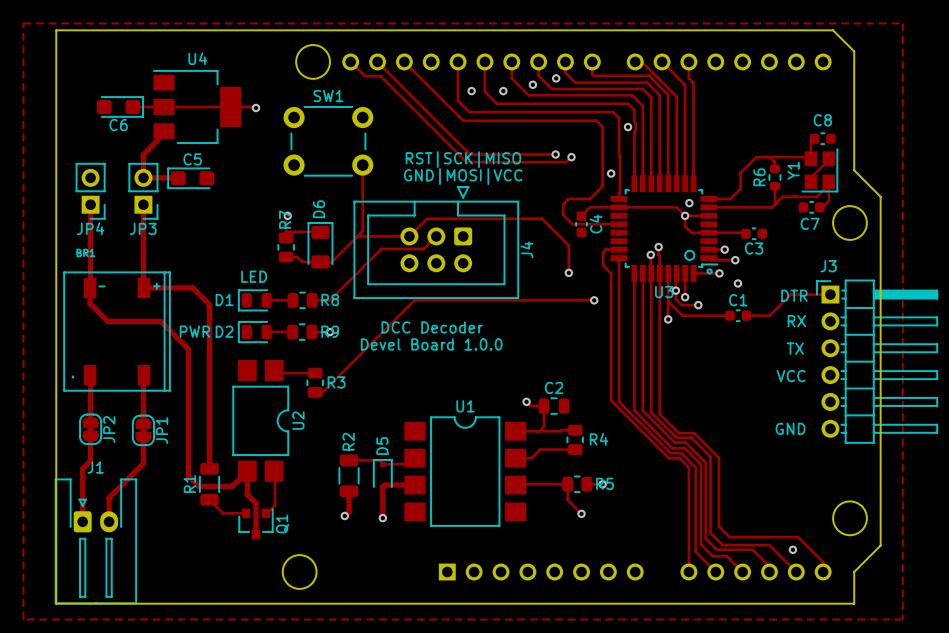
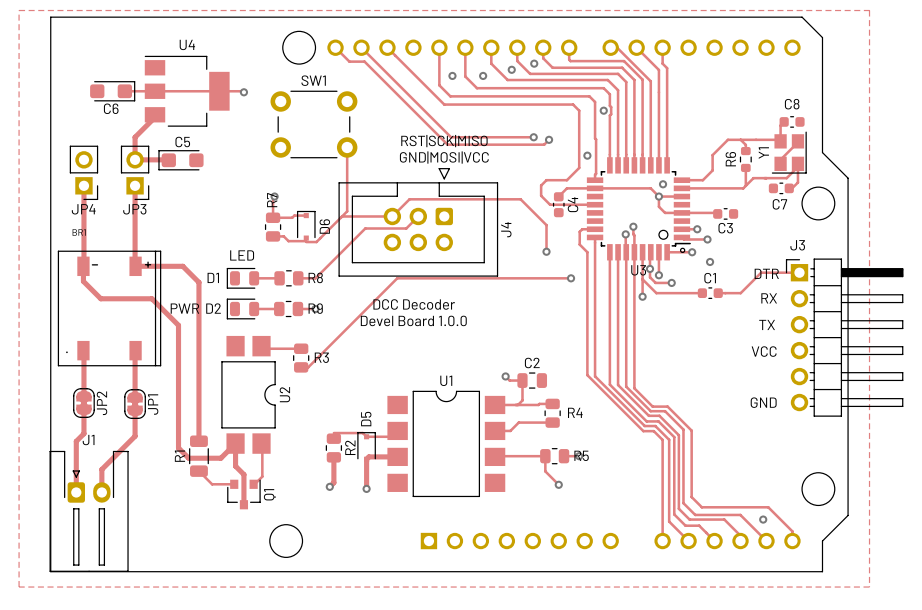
D6 name position: D6 (319, 209) -> D6 (324, 226)
D6 footprint: [307, 222, 334, 269] -> [296, 210, 316, 241]
track: (320, 231) (286, 231) -> none
track: none -> (306, 215) (273, 217)
R2 name position: R2 (348, 441) -> R2 (350, 447)
R2 footprint: [338, 454, 360, 498] -> [325, 433, 343, 463]

